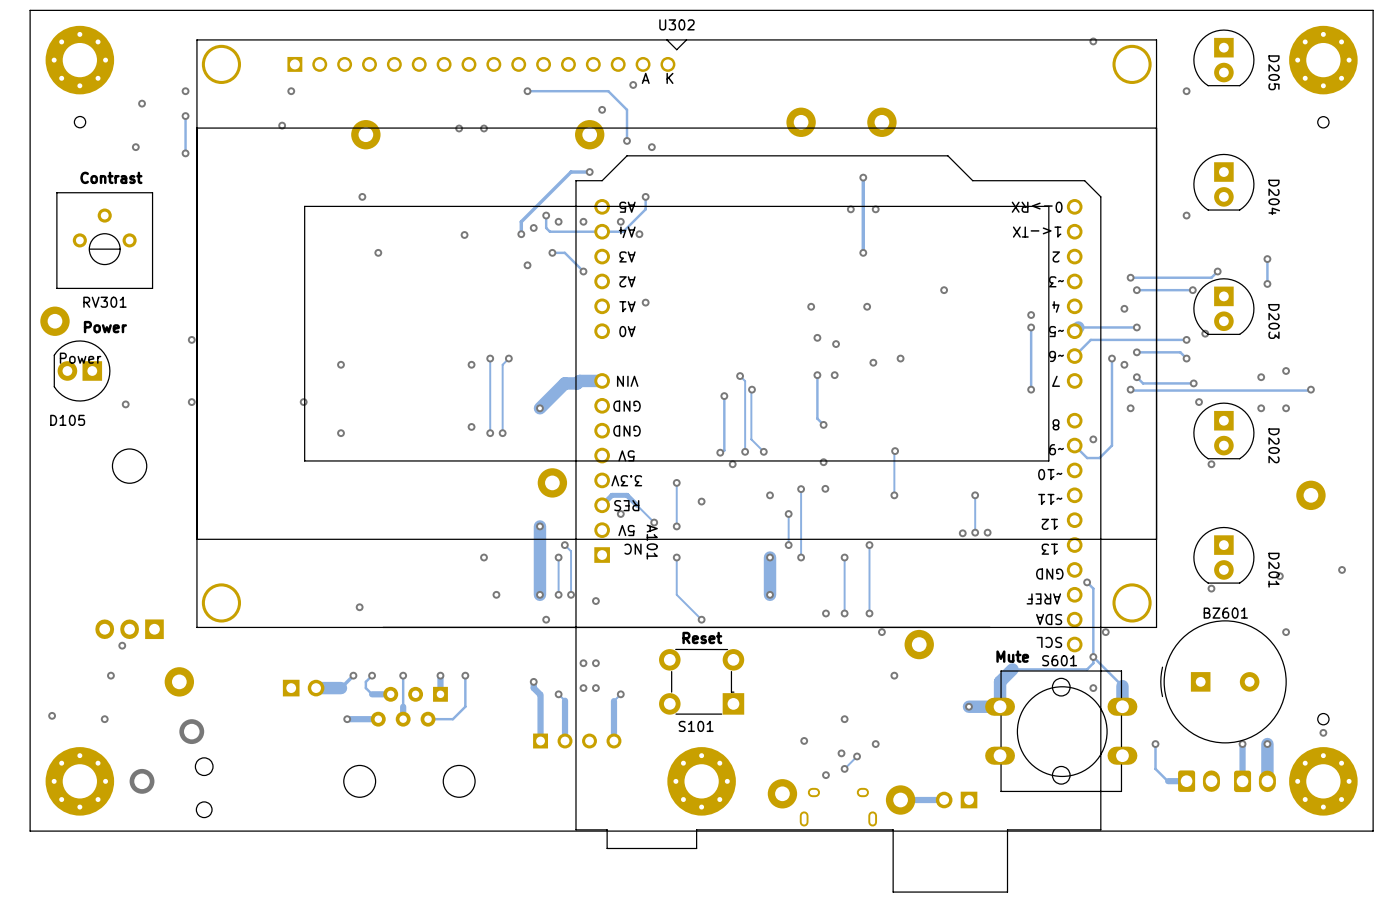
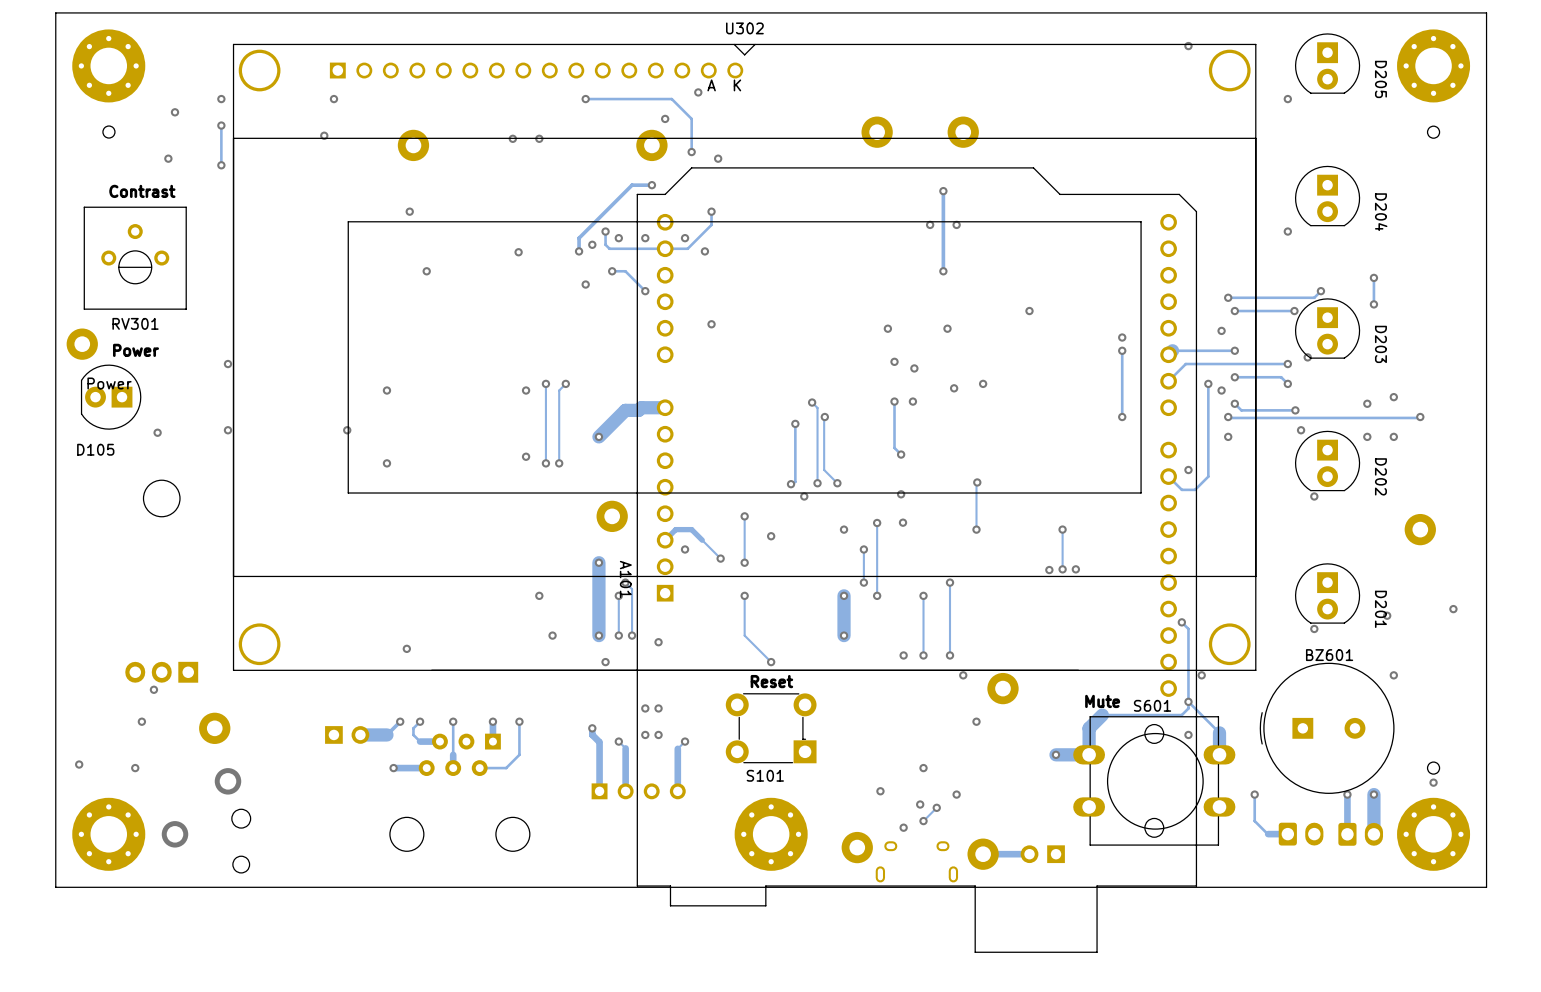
A101 footprint: [575, 155, 1102, 893] -> [636, 167, 1198, 953]
A101 name position: A101 (652, 542) -> A101 (625, 579)

